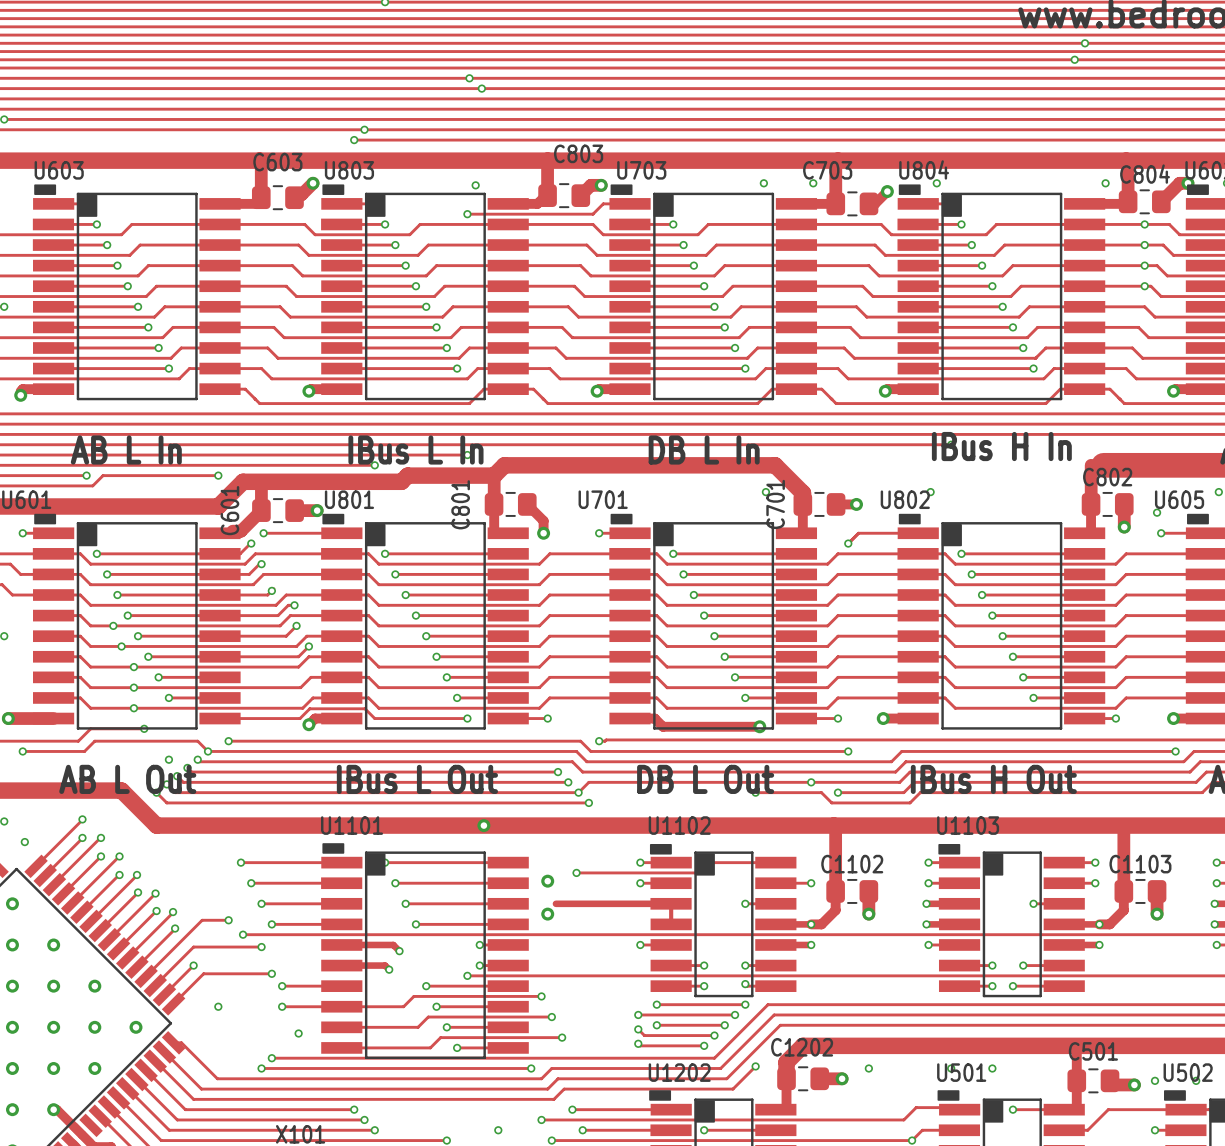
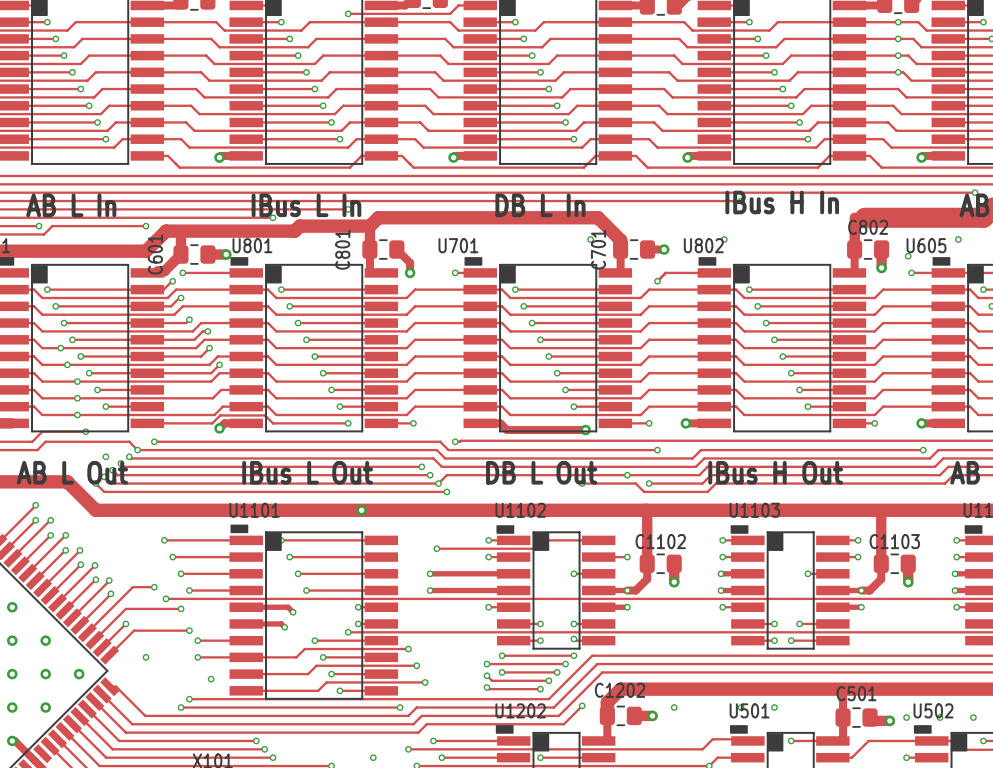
via: (547, 881) -> none
track: (555, 903) (568, 903) -> none
via: none -> (430, 573)
track: (671, 903) (671, 924) -> (430, 590) (513, 590)
via: (547, 914) -> none
via: none -> (430, 590)

